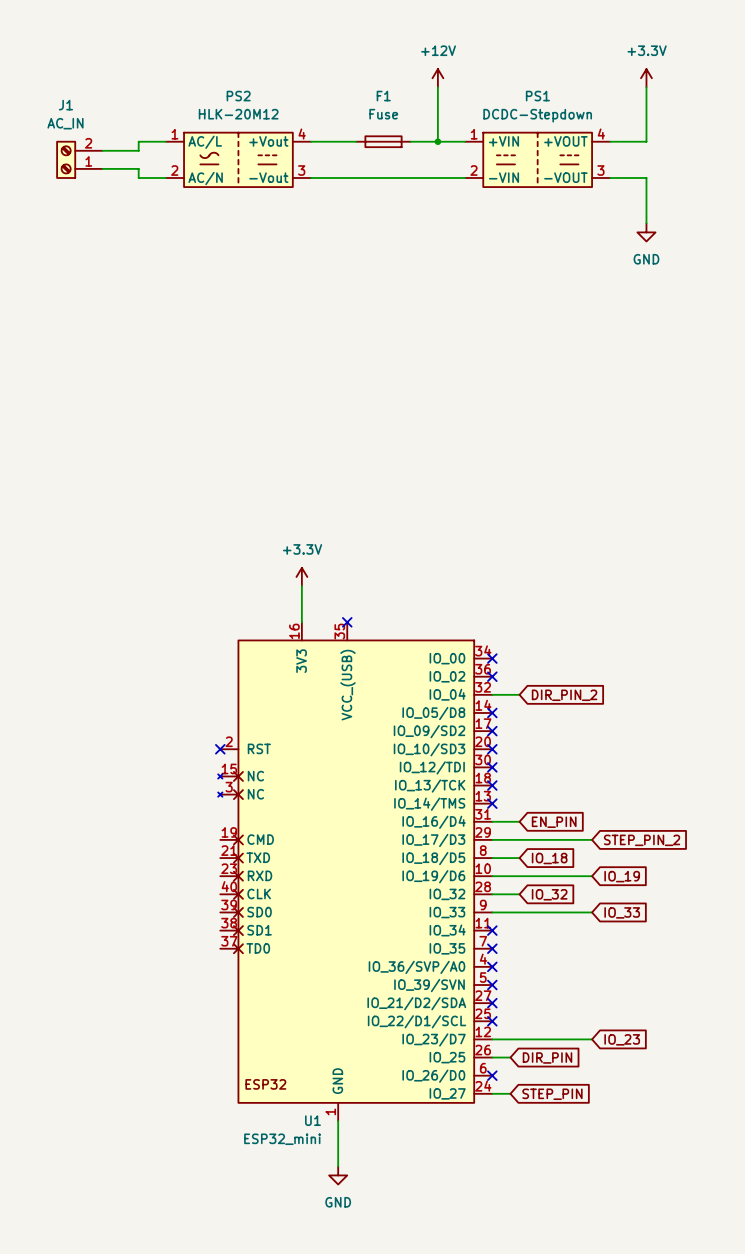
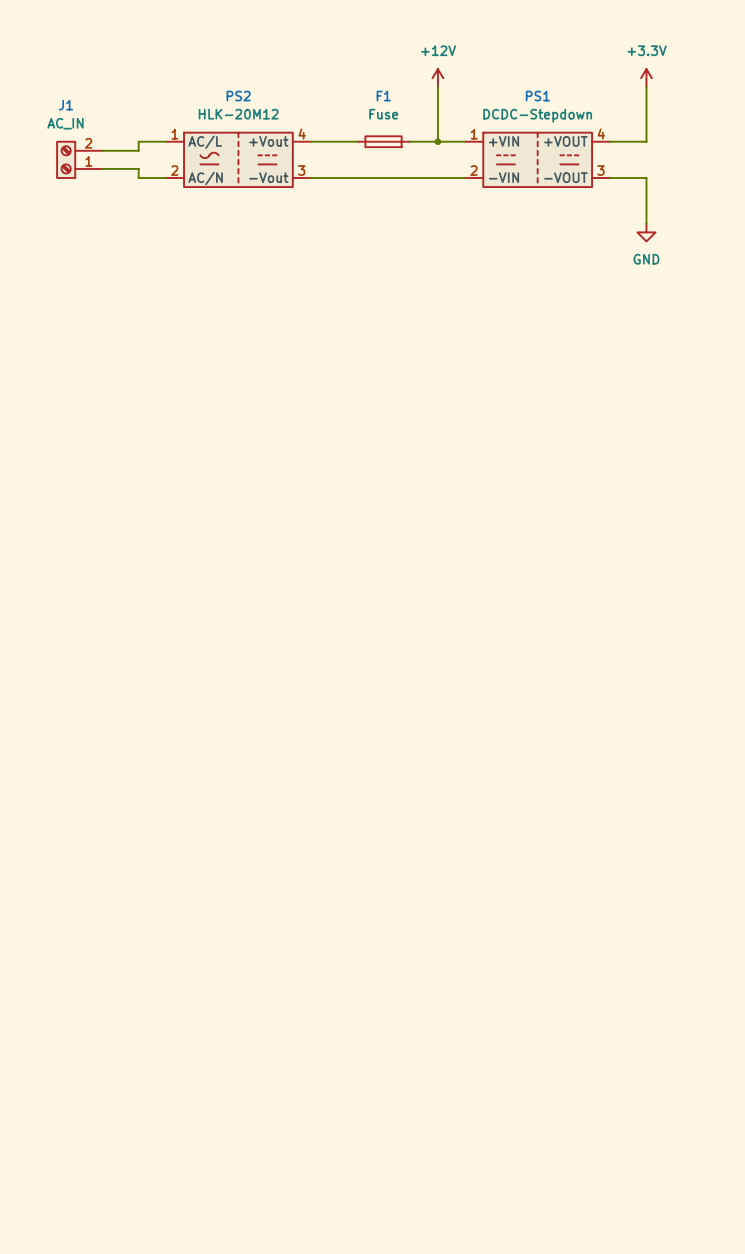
power symbol: +3.3V (301, 576) -> none
wire: (301, 586) (301, 622) -> none
no-connect mark: (347, 622) -> none
no-connect mark: (492, 658) -> none
no-connect mark: (492, 676) -> none
wire: (492, 694) (519, 694) -> none
global label: DIR_PIN_2 (564, 695) -> none
no-connect mark: (492, 712) -> none
no-connect mark: (492, 731) -> none
no-connect mark: (220, 749) -> none
no-connect mark: (492, 749) -> none
no-connect mark: (492, 767) -> none
no-connect mark: (492, 785) -> none
no-connect mark: (492, 803) -> none
wire: (492, 821) (519, 821) -> none
global label: EN_PIN (554, 822) -> none
wire: (492, 839) (592, 839) -> none
global label: STEP_PIN_2 (642, 840) -> none
wire: (492, 858) (519, 858) -> none
global label: IO_18 (549, 858) -> none
U1: ESP32_mini (355, 871) -> none
wire: (492, 876) (592, 876) -> none
global label: IO_19 (622, 876) -> none
wire: (492, 894) (519, 894) -> none
global label: IO_32 (549, 894) -> none
wire: (492, 912) (592, 912) -> none
global label: IO_33 (622, 912) -> none
no-connect mark: (492, 930) -> none
no-connect mark: (492, 948) -> none
no-connect mark: (492, 966) -> none
no-connect mark: (492, 985) -> none
no-connect mark: (492, 1003) -> none
no-connect mark: (492, 1021) -> none
wire: (492, 1039) (592, 1039) -> none
global label: IO_23 (622, 1039) -> none
wire: (492, 1057) (510, 1057) -> none
global label: DIR_PIN (547, 1057) -> none
no-connect mark: (492, 1075) -> none
wire: (492, 1093) (510, 1093) -> none
global label: STEP_PIN (552, 1094) -> none
wire: (338, 1121) (338, 1166) -> none
power symbol: GND (338, 1175) -> none

